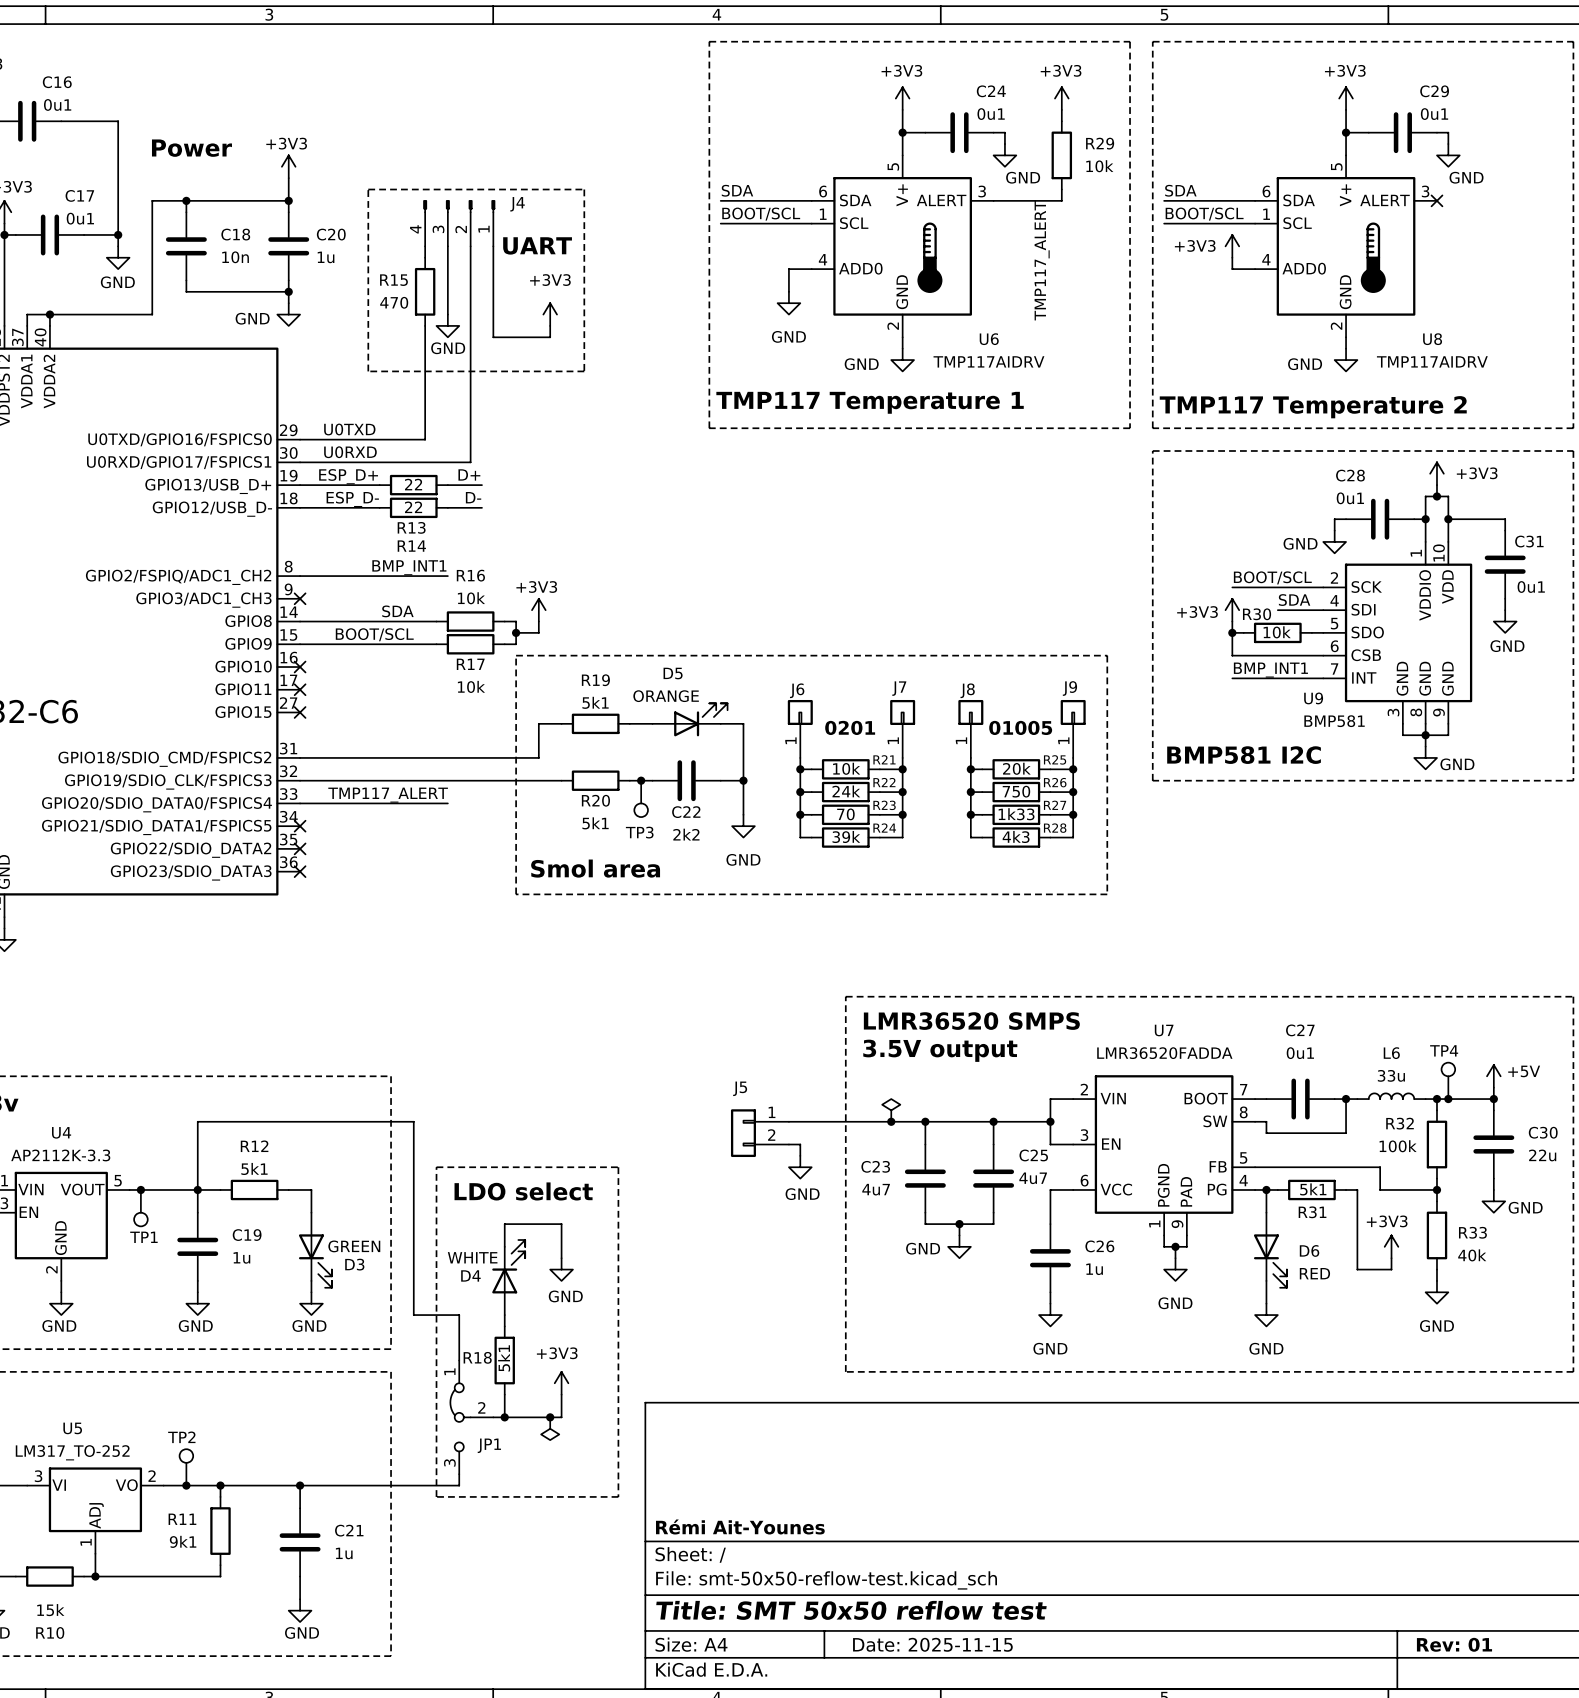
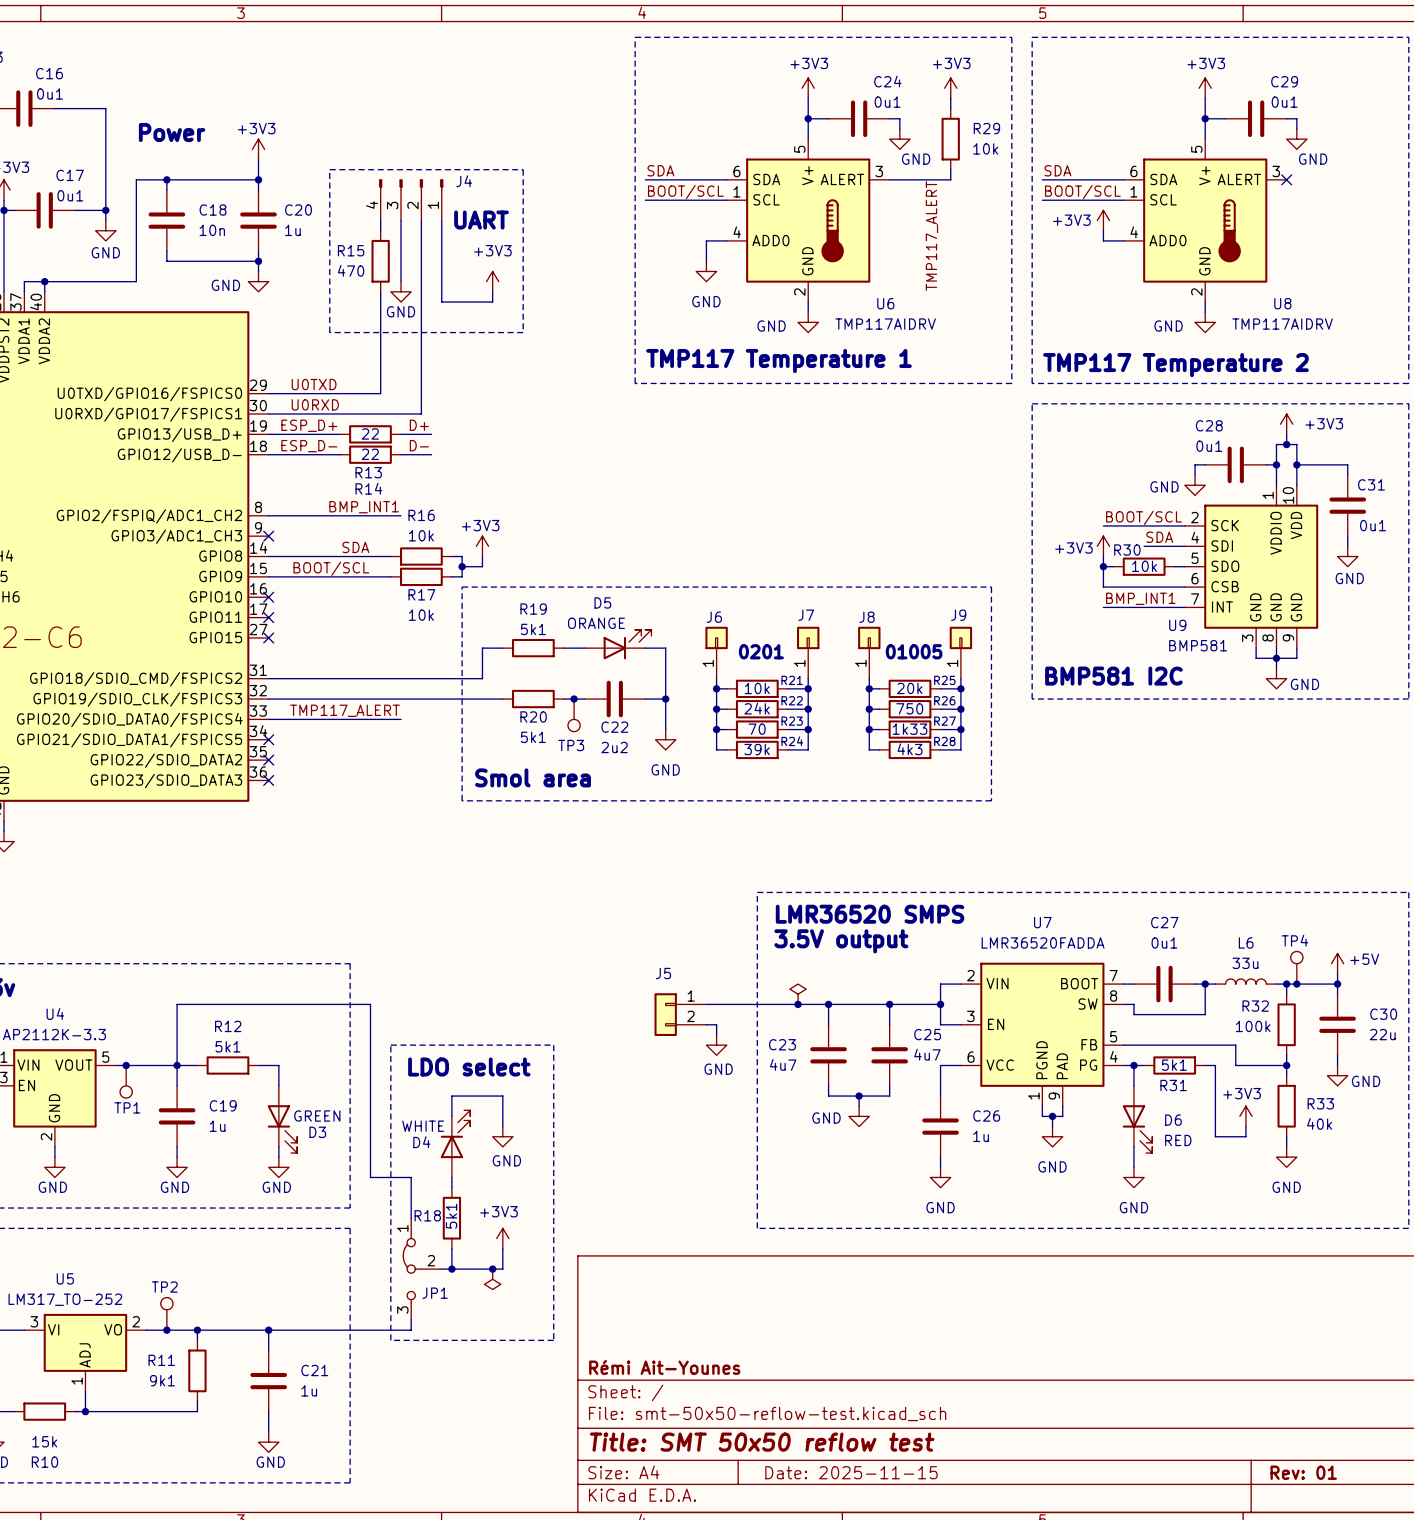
C22 value: 2k2 (686, 834) -> 2u2 (614, 747)

